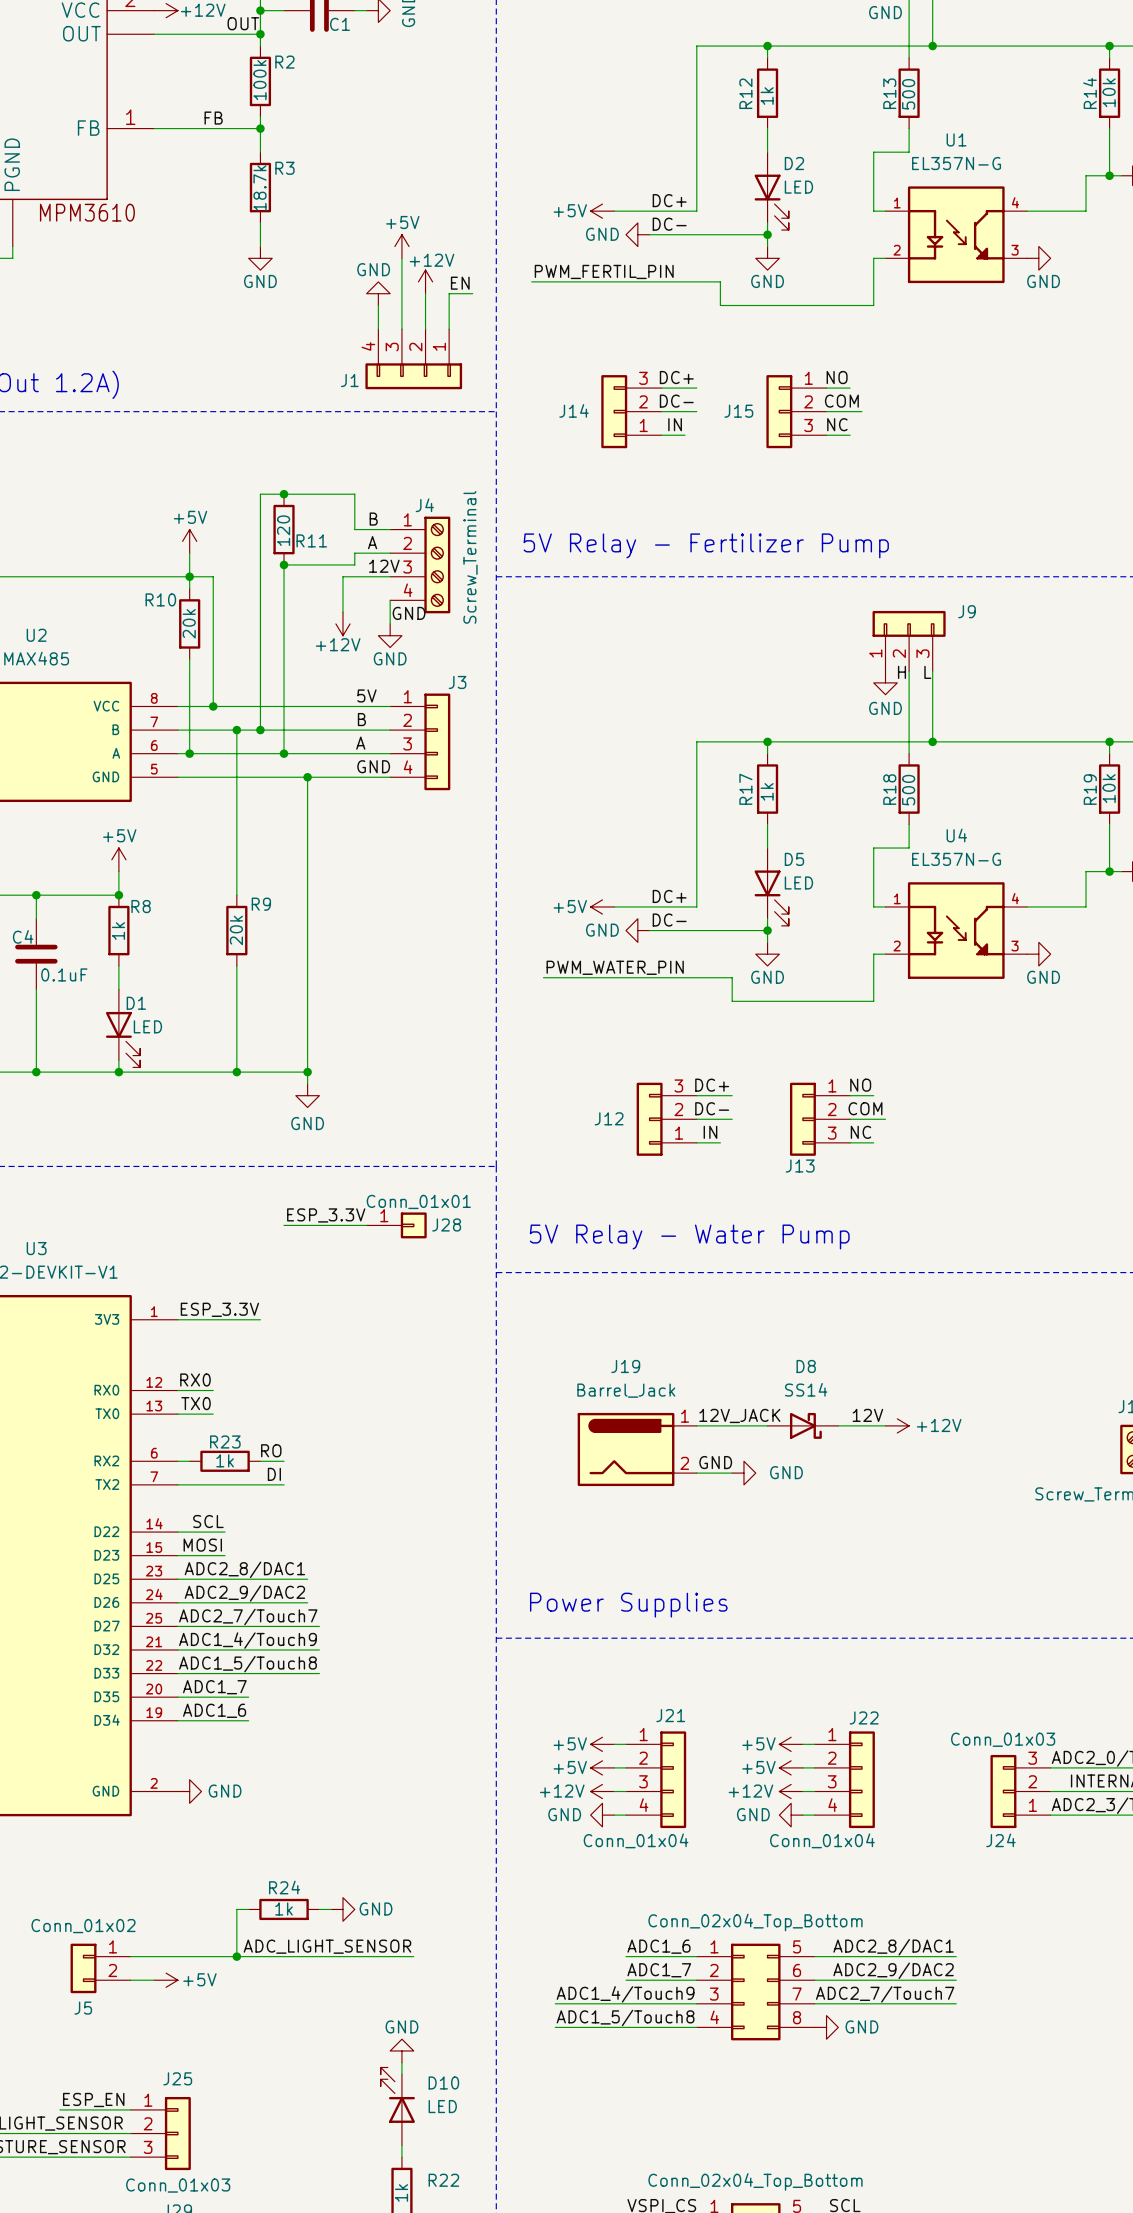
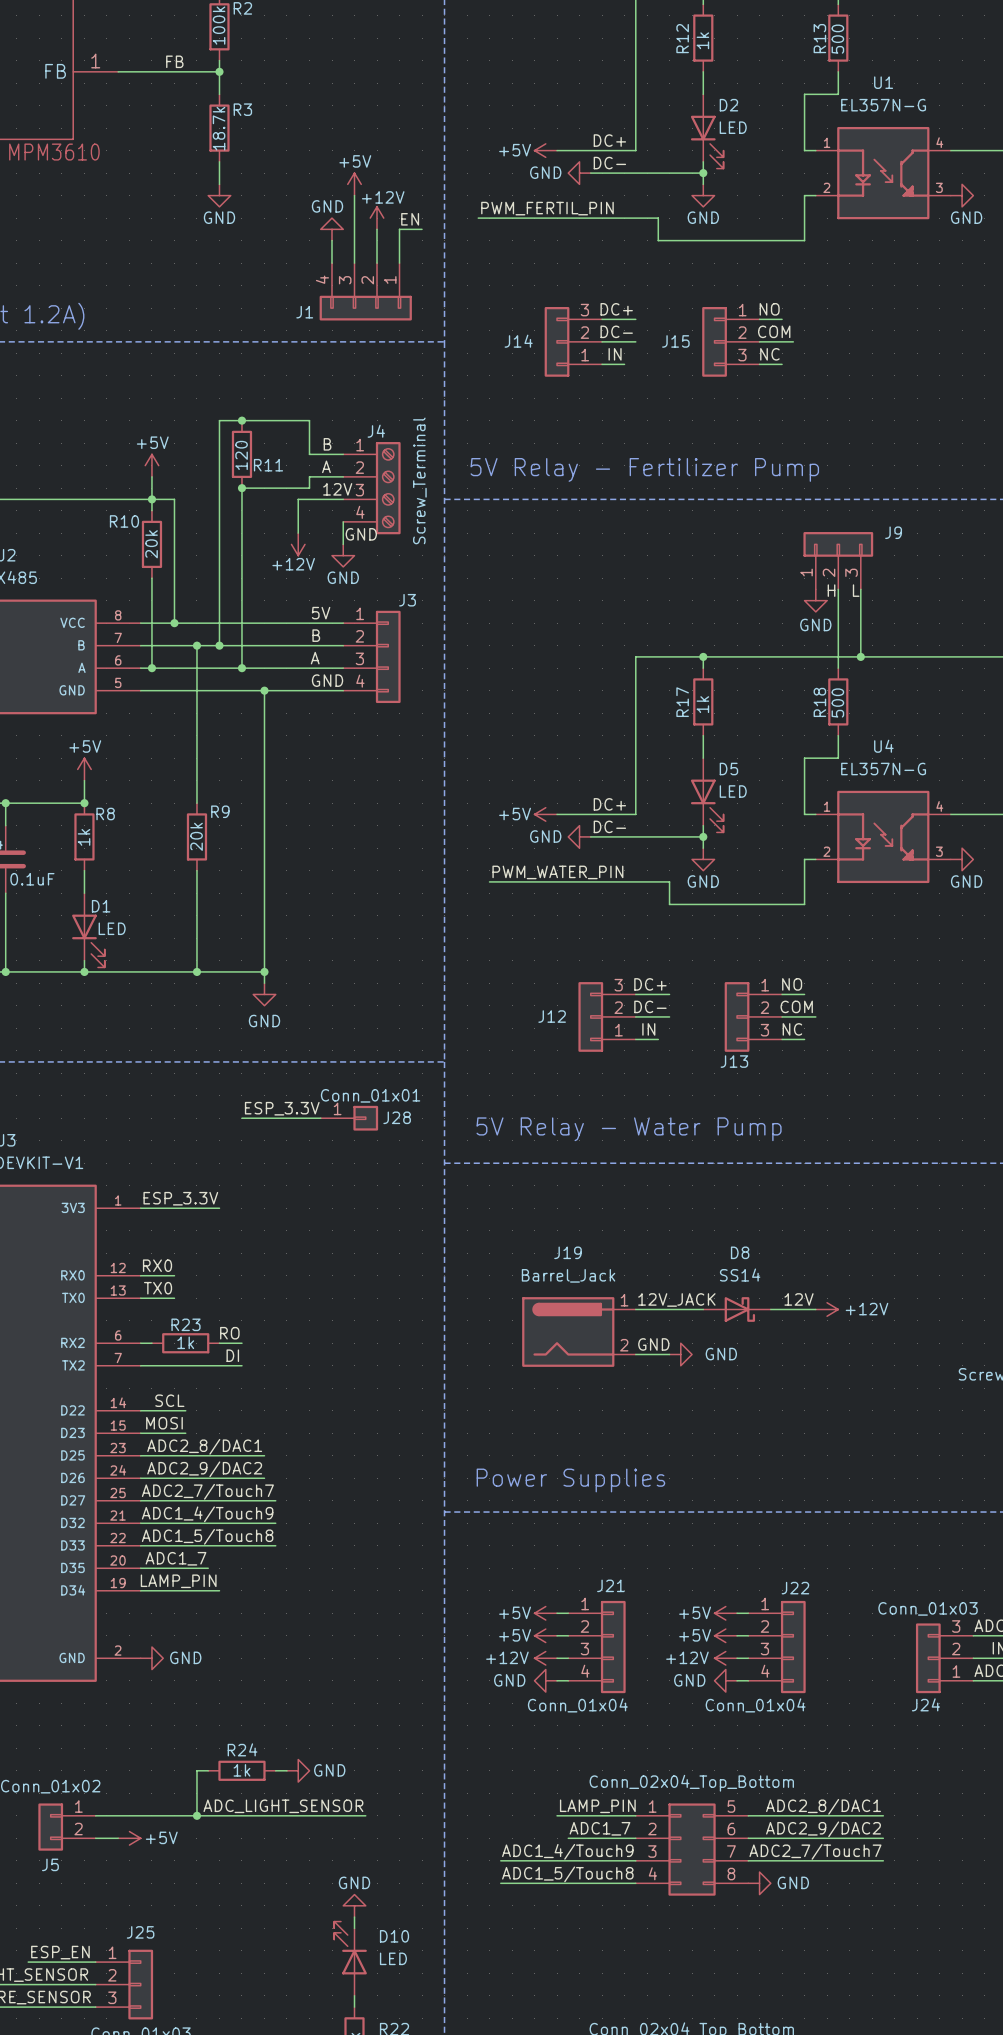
label: ADC1_6 (214, 1710) -> none
label: none -> LAMP_PIN (178, 1581)
wire: none -> (208, 1590) (219, 1590)
label: none -> LAMP_PIN (597, 1806)
label: ADC1_6 (658, 1946) -> none
wire: none -> (557, 1815) (568, 1815)

